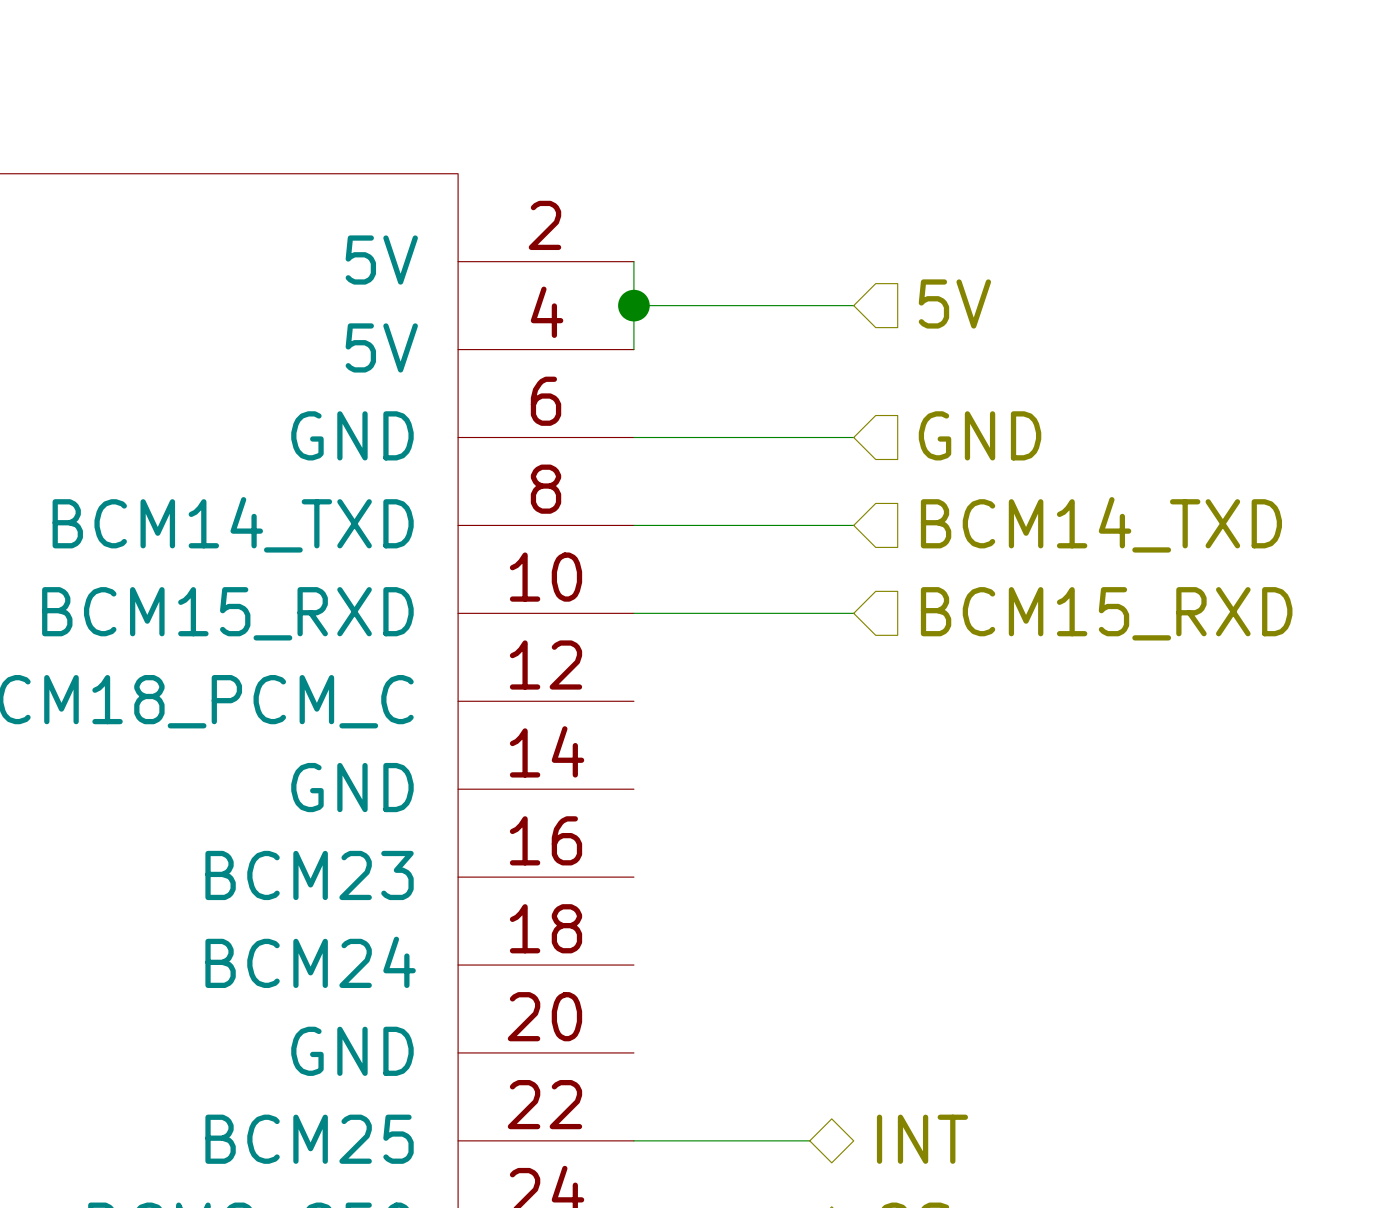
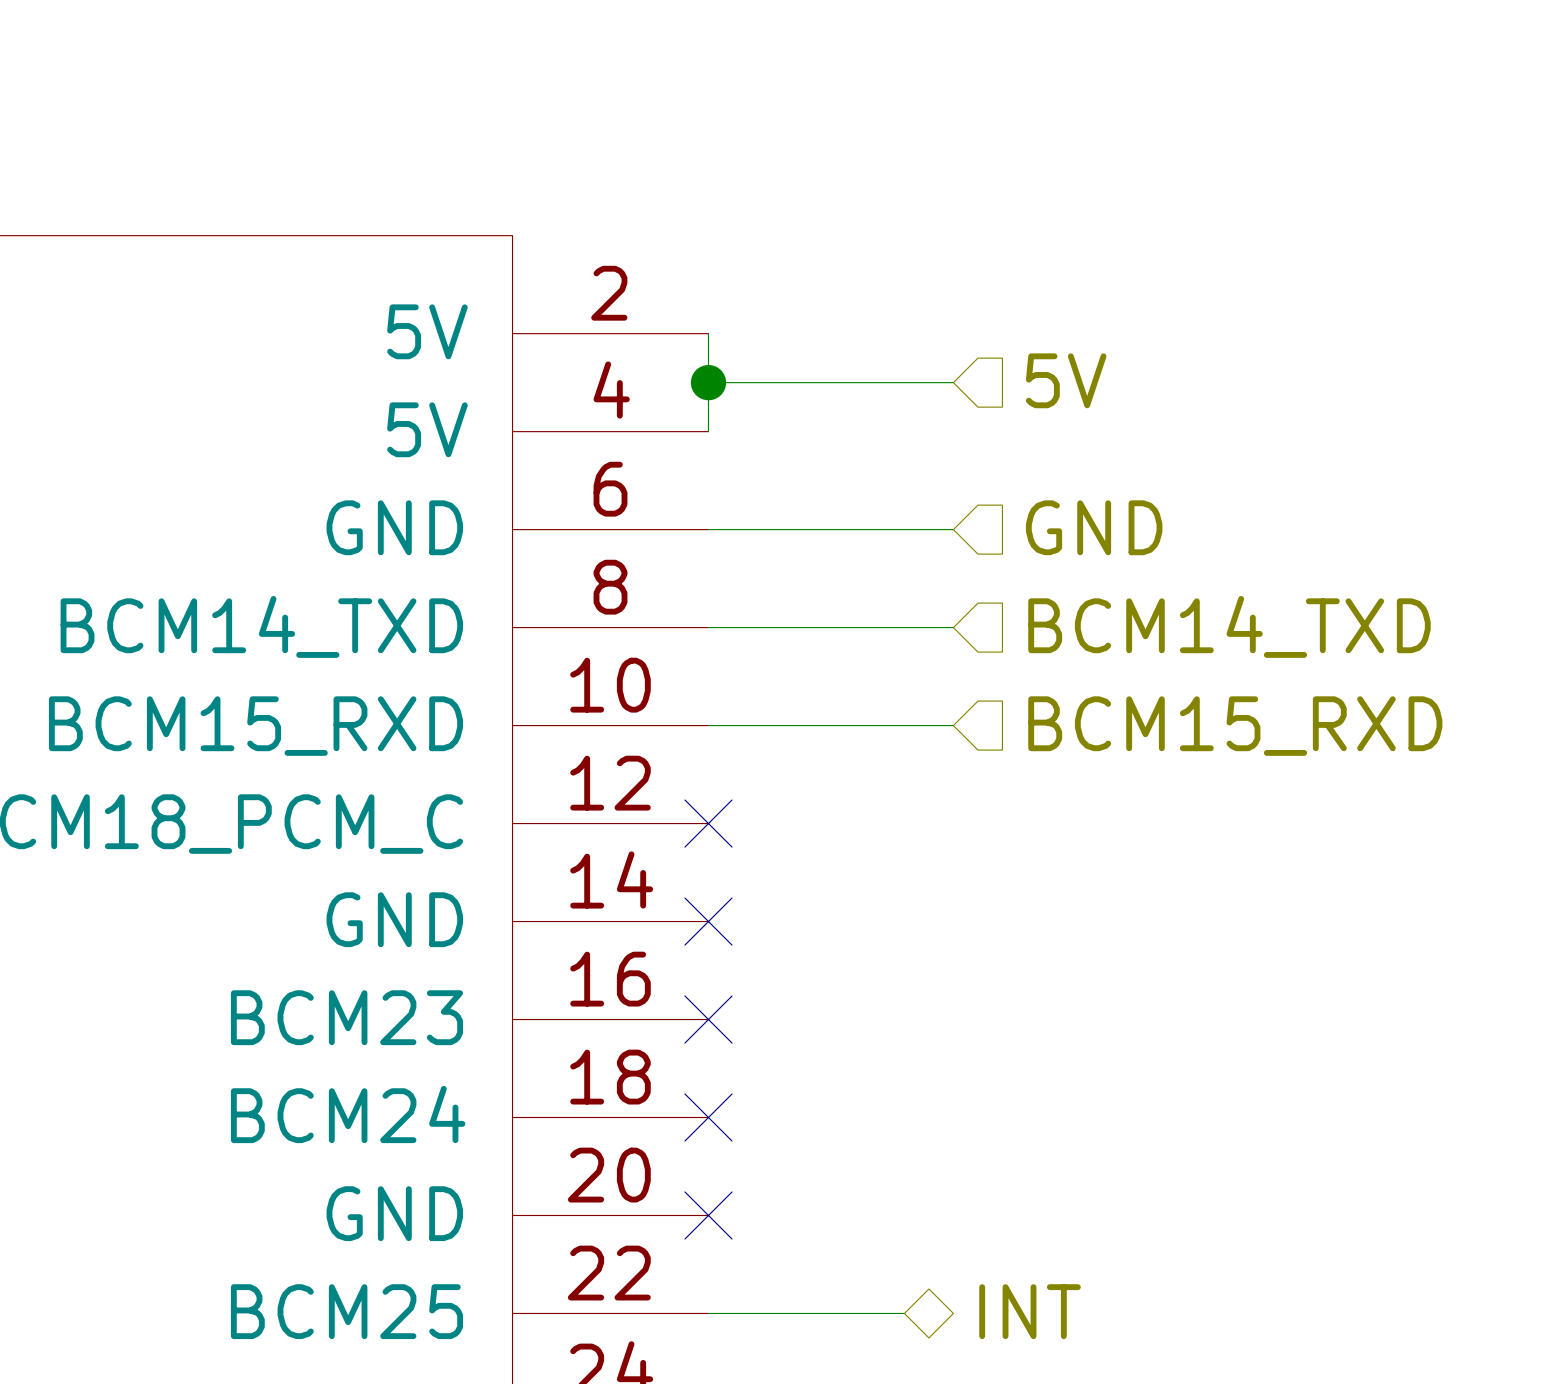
no-connect mark: none -> (708, 823)
no-connect mark: none -> (708, 921)
no-connect mark: none -> (708, 1019)
no-connect mark: none -> (708, 1117)
no-connect mark: none -> (708, 1215)

